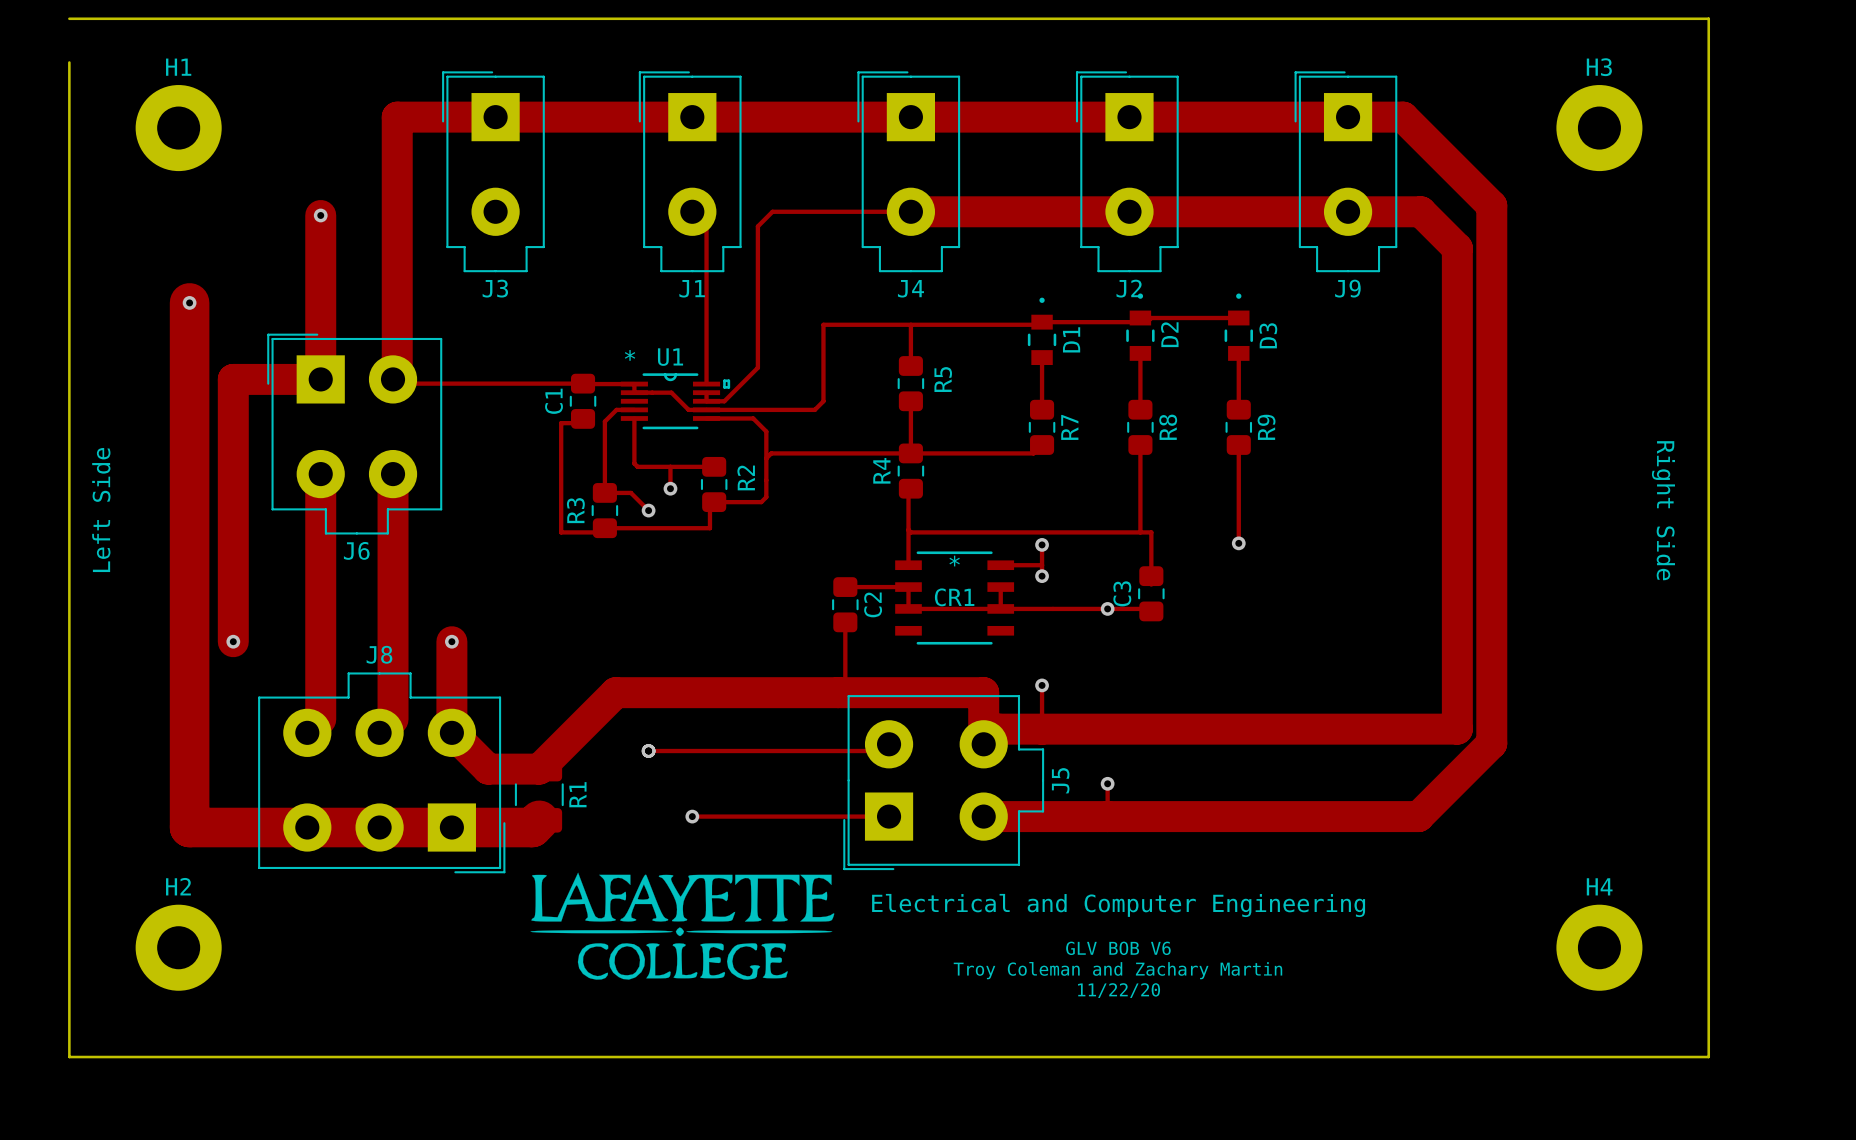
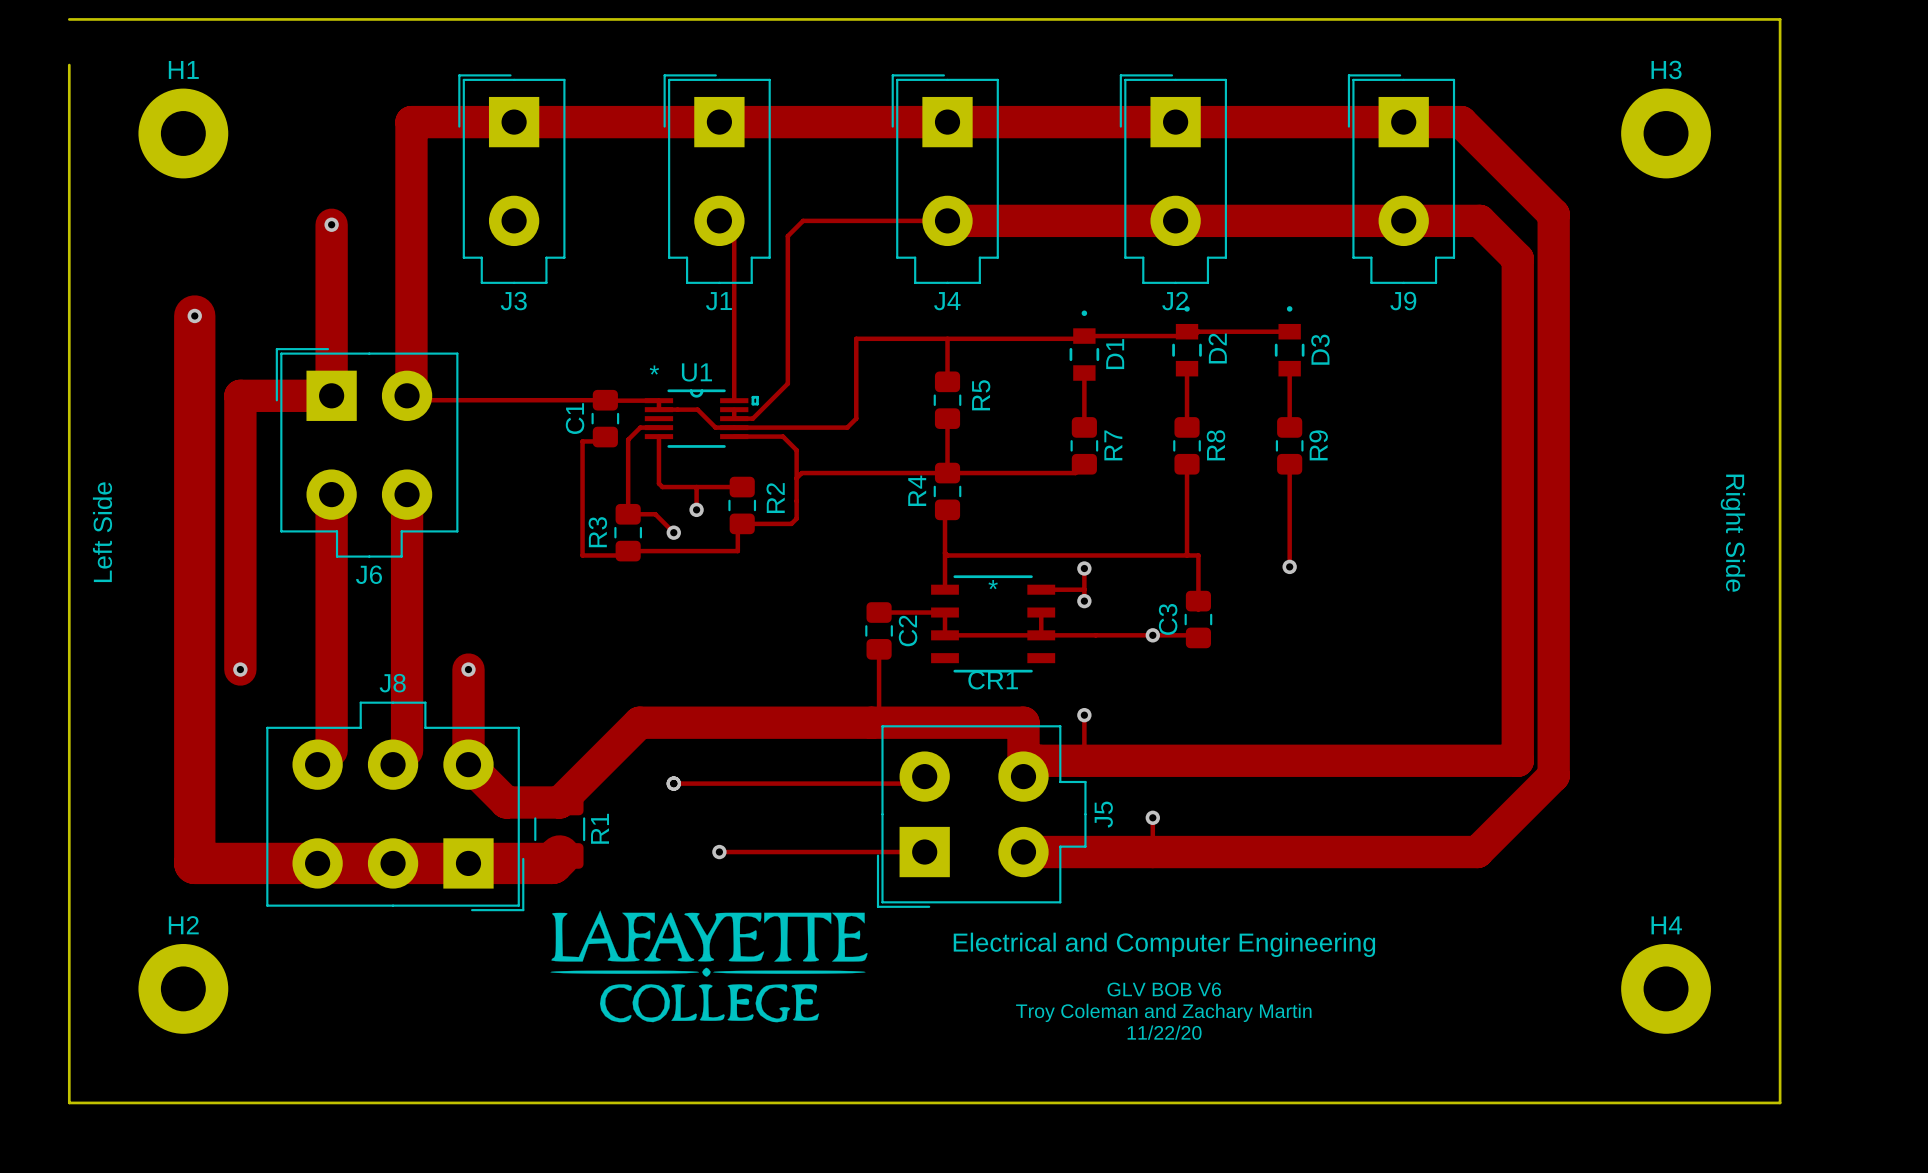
CR1 name position: CR1 (954, 597) -> CR1 (993, 680)

